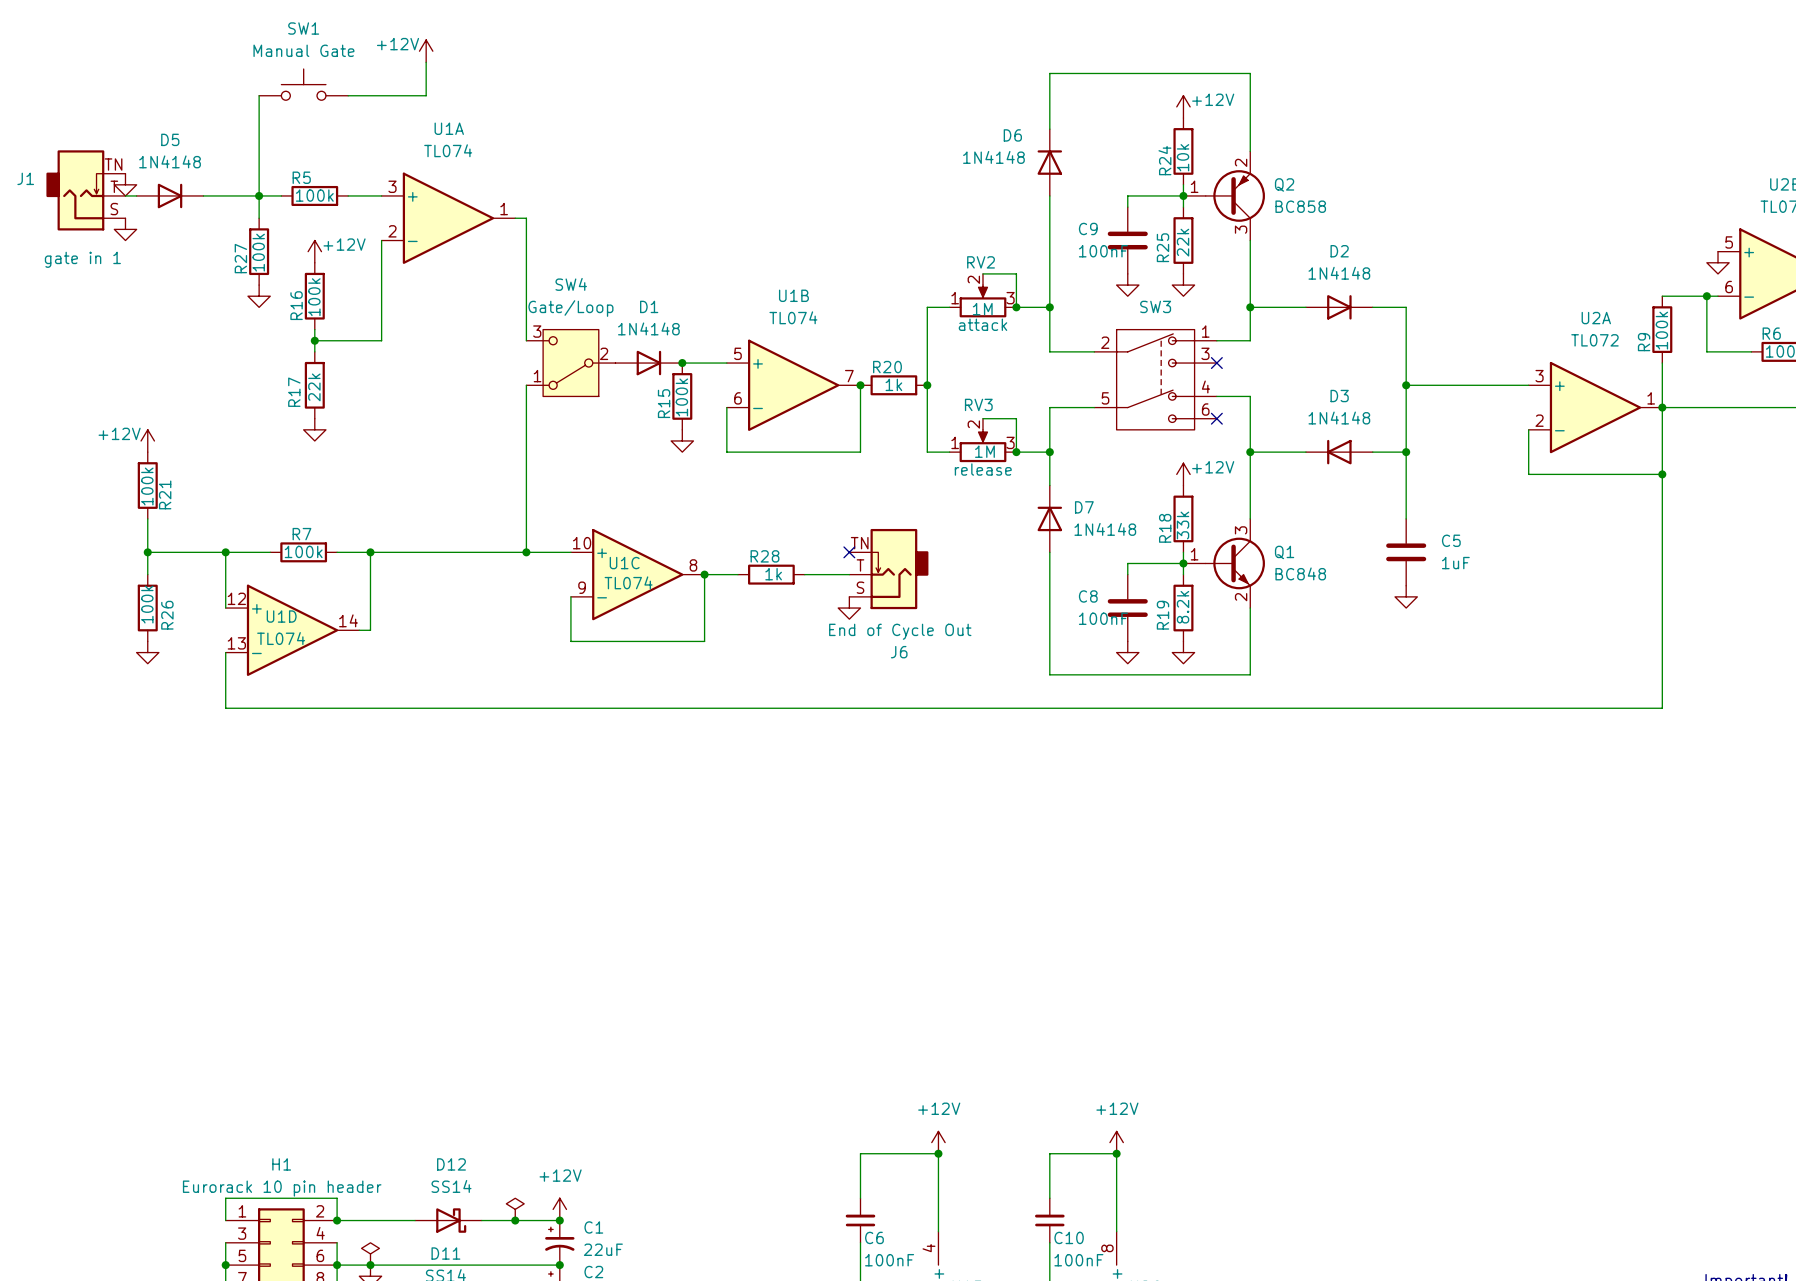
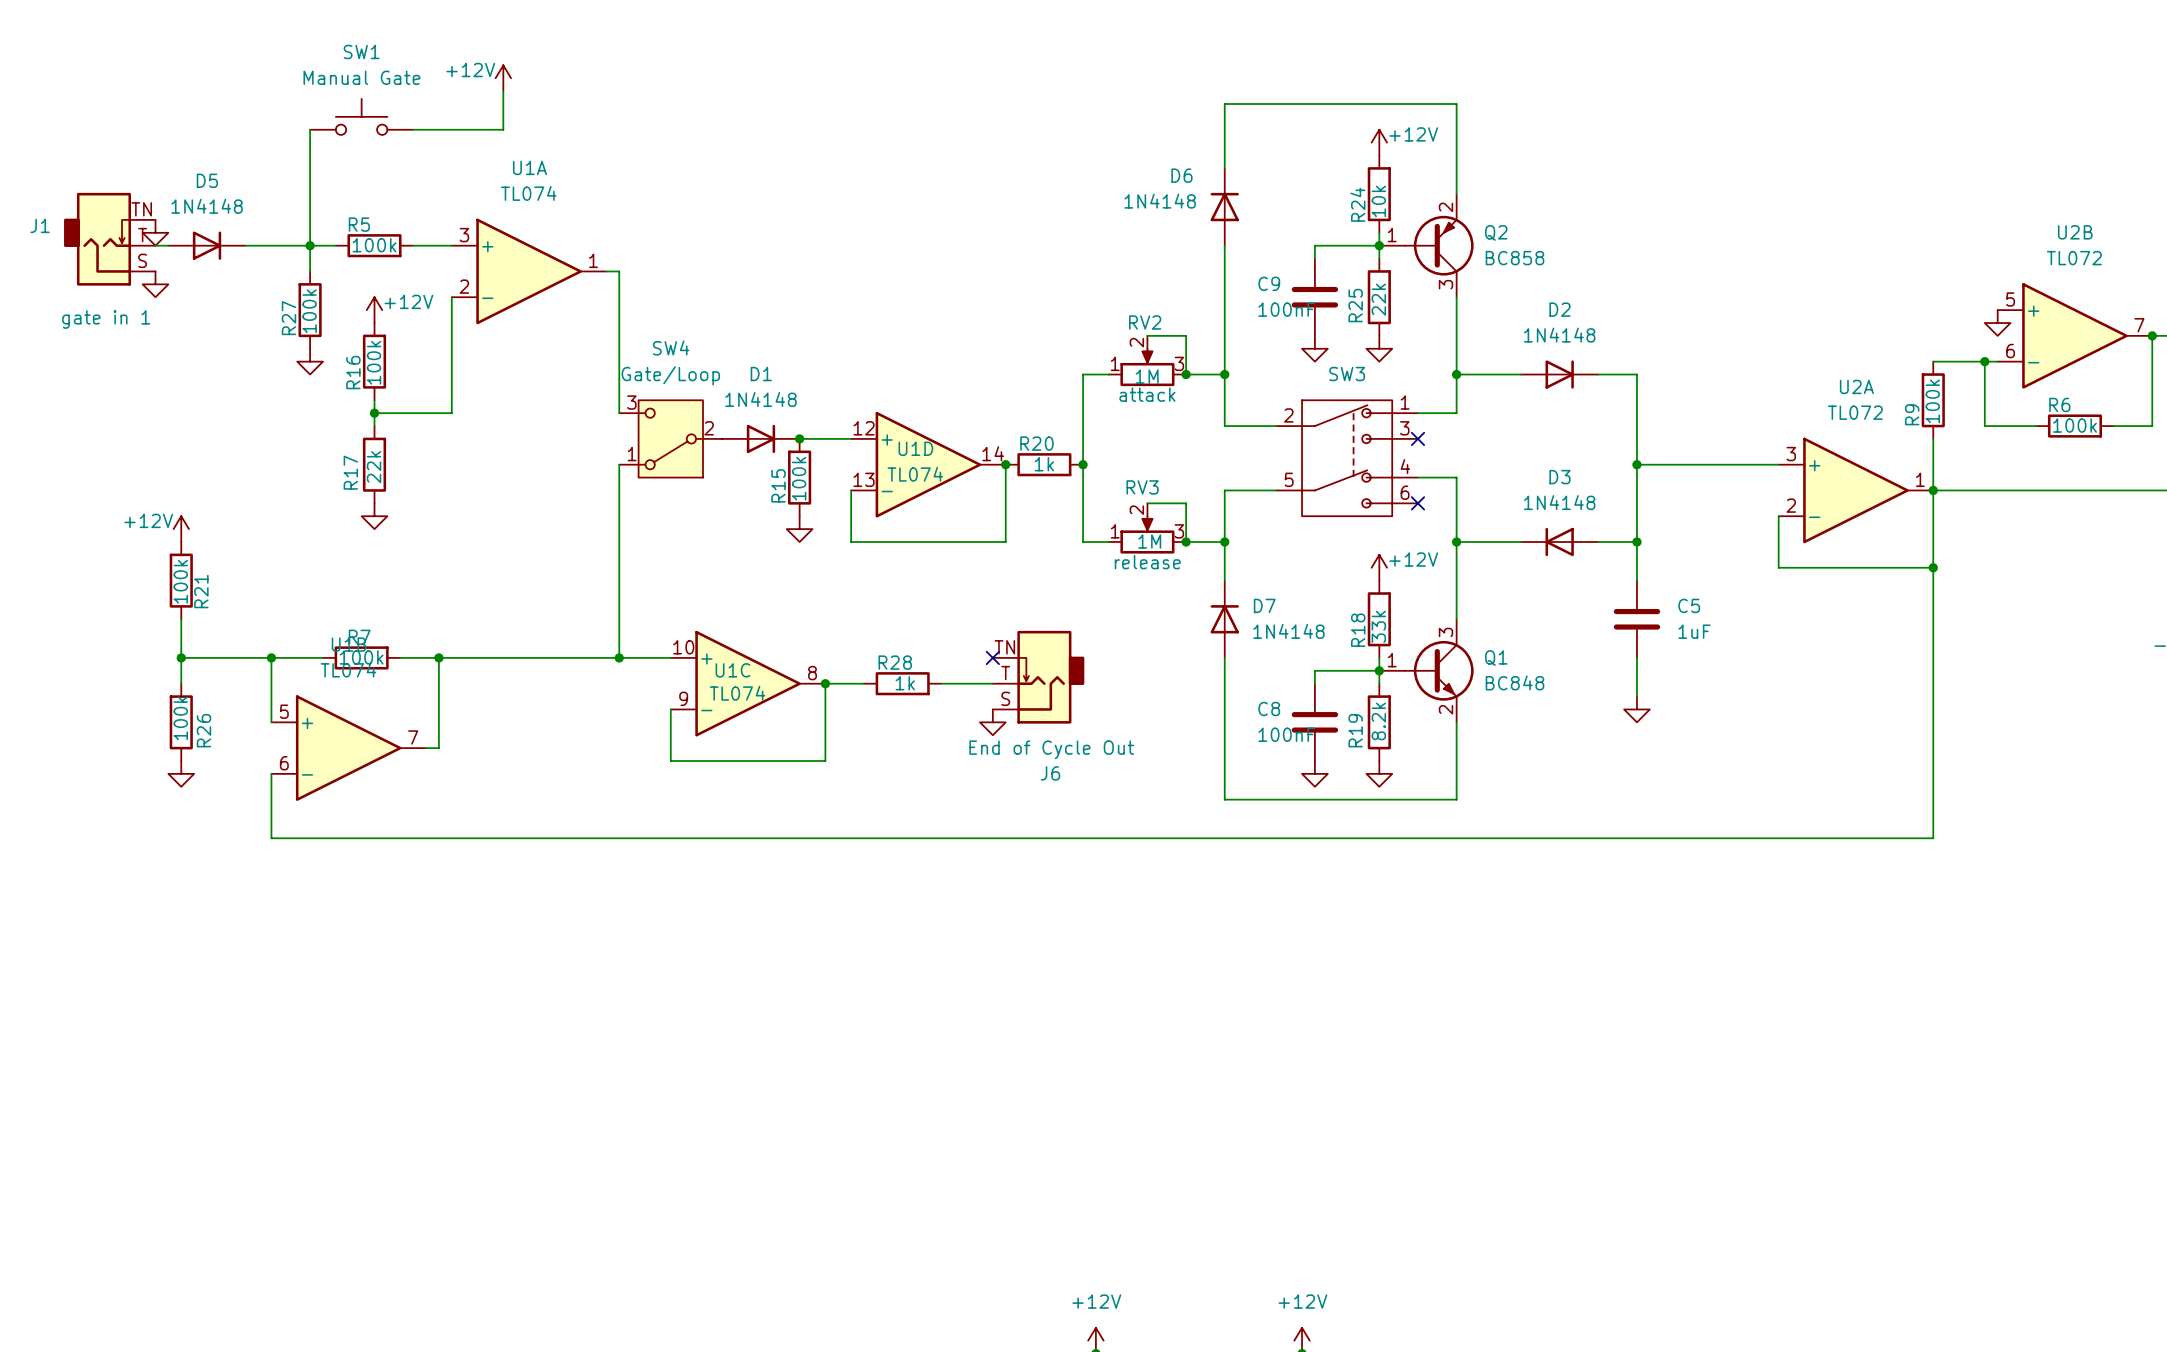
U1B position: (793, 385) -> (348, 748)
C5 position: (1406, 552) -> (1636, 619)
U1D position: (292, 630) -> (928, 464)

